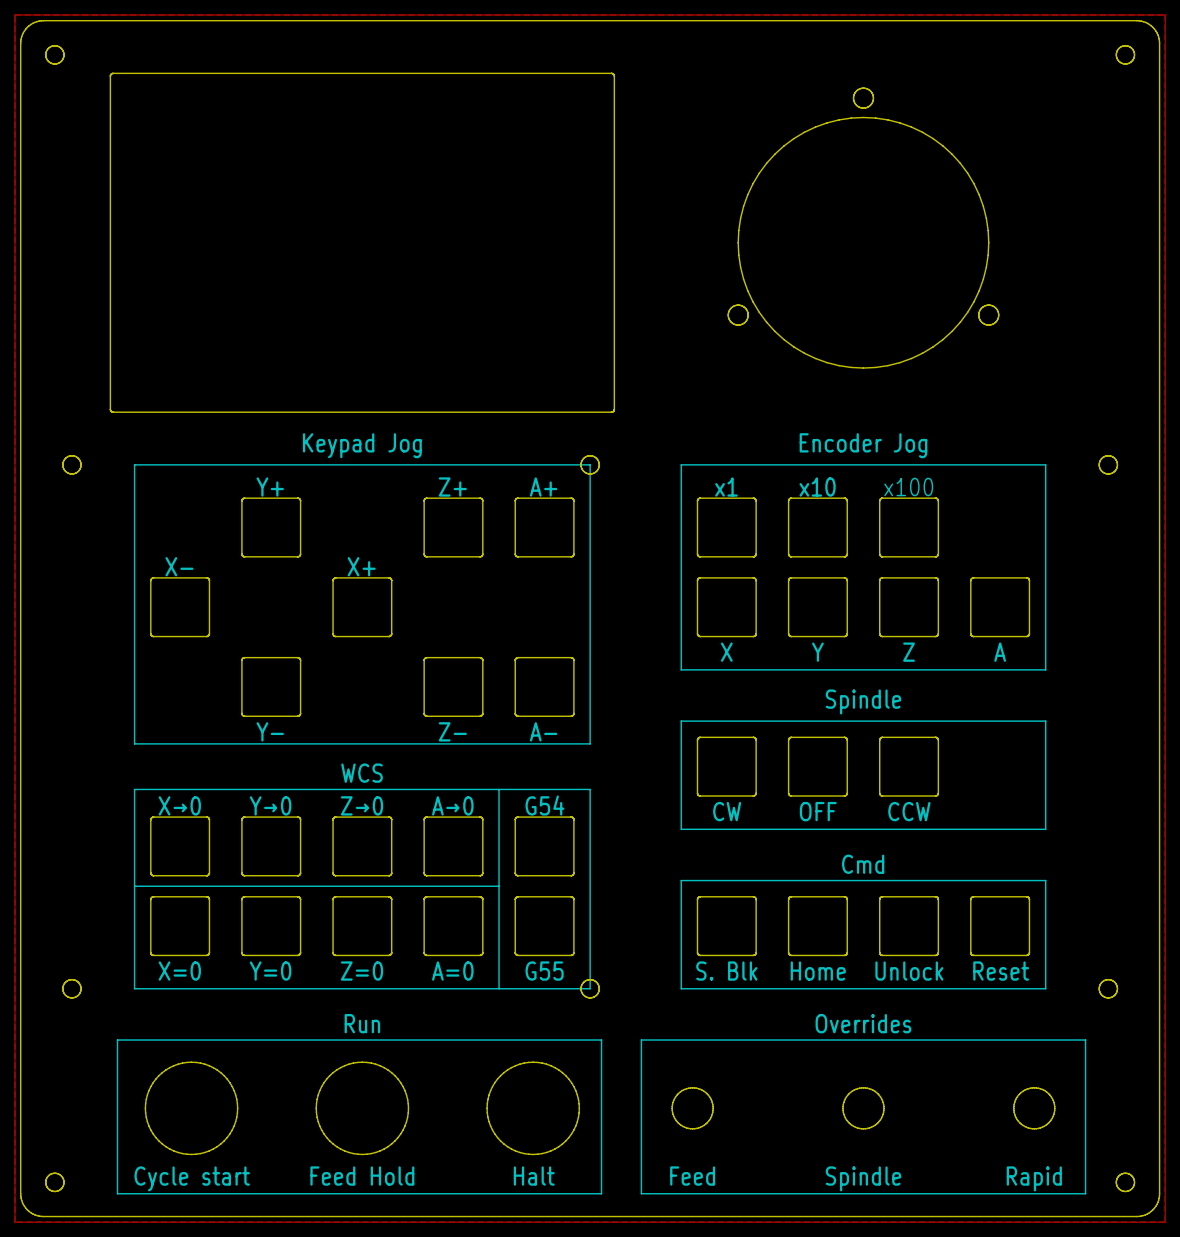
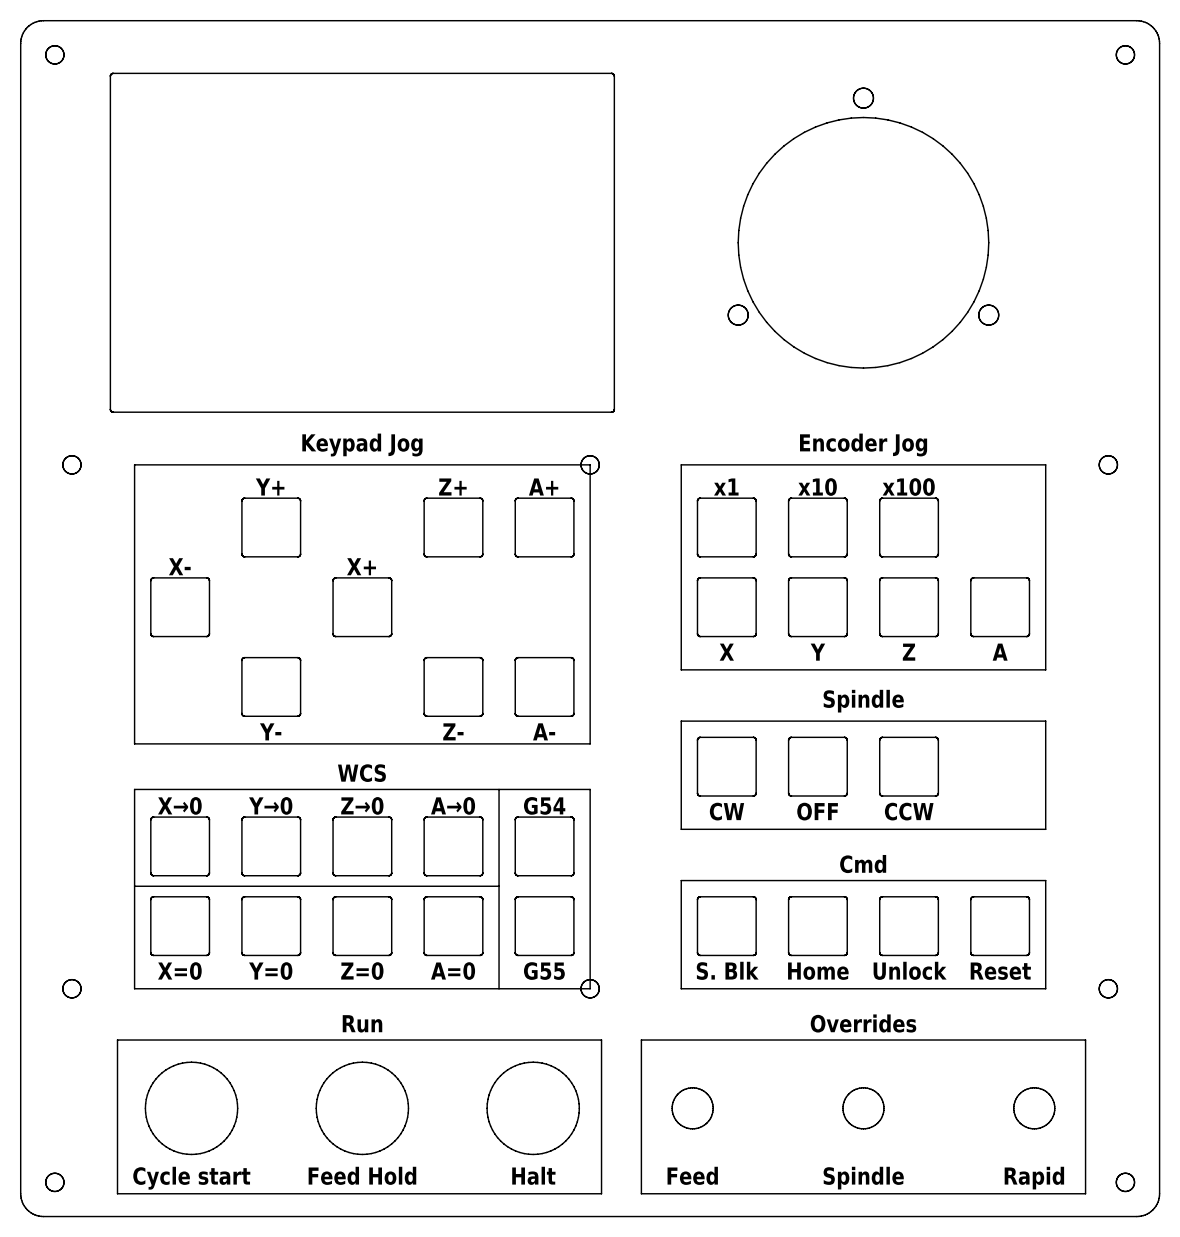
top track: (15, 15) (1165, 15) (1165, 1222) (15, 1222) (15, 15) -> none

